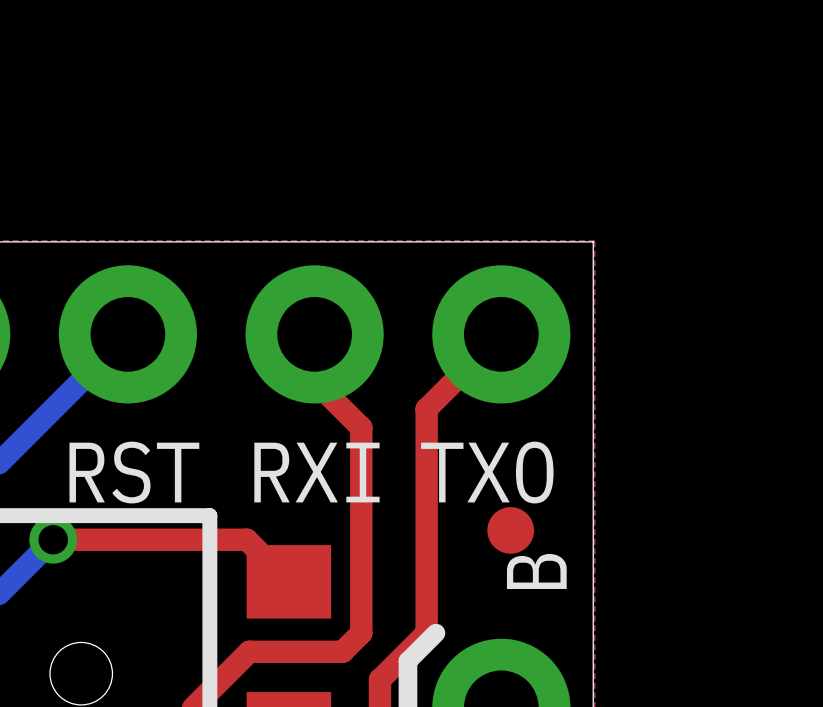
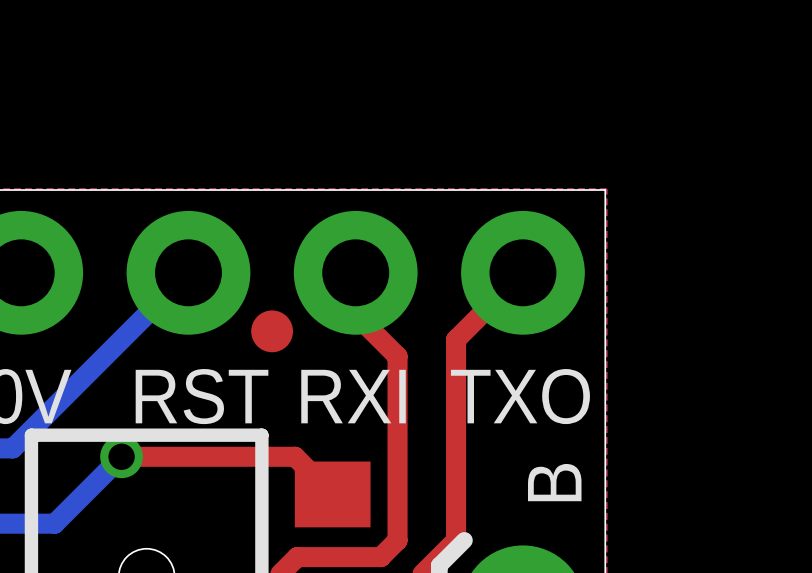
part position: (510, 530) -> (272, 331)

